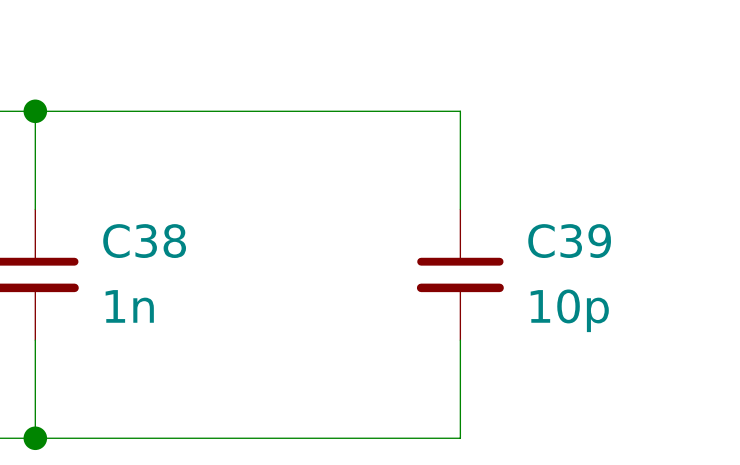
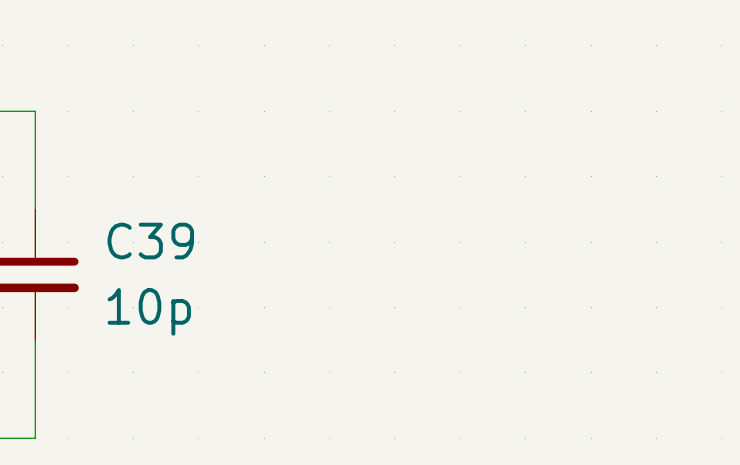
wire: (35, 111) (460, 111) (460, 209) -> none
junction: (35, 111) -> none
C38 name: C38 (144, 241) -> C39 (150, 241)
C39: 10p (460, 274) -> none
C38 value: 1n (129, 306) -> 10p (149, 311)
wire: (460, 340) (460, 438) (35, 438) -> none
junction: (35, 438) -> none

